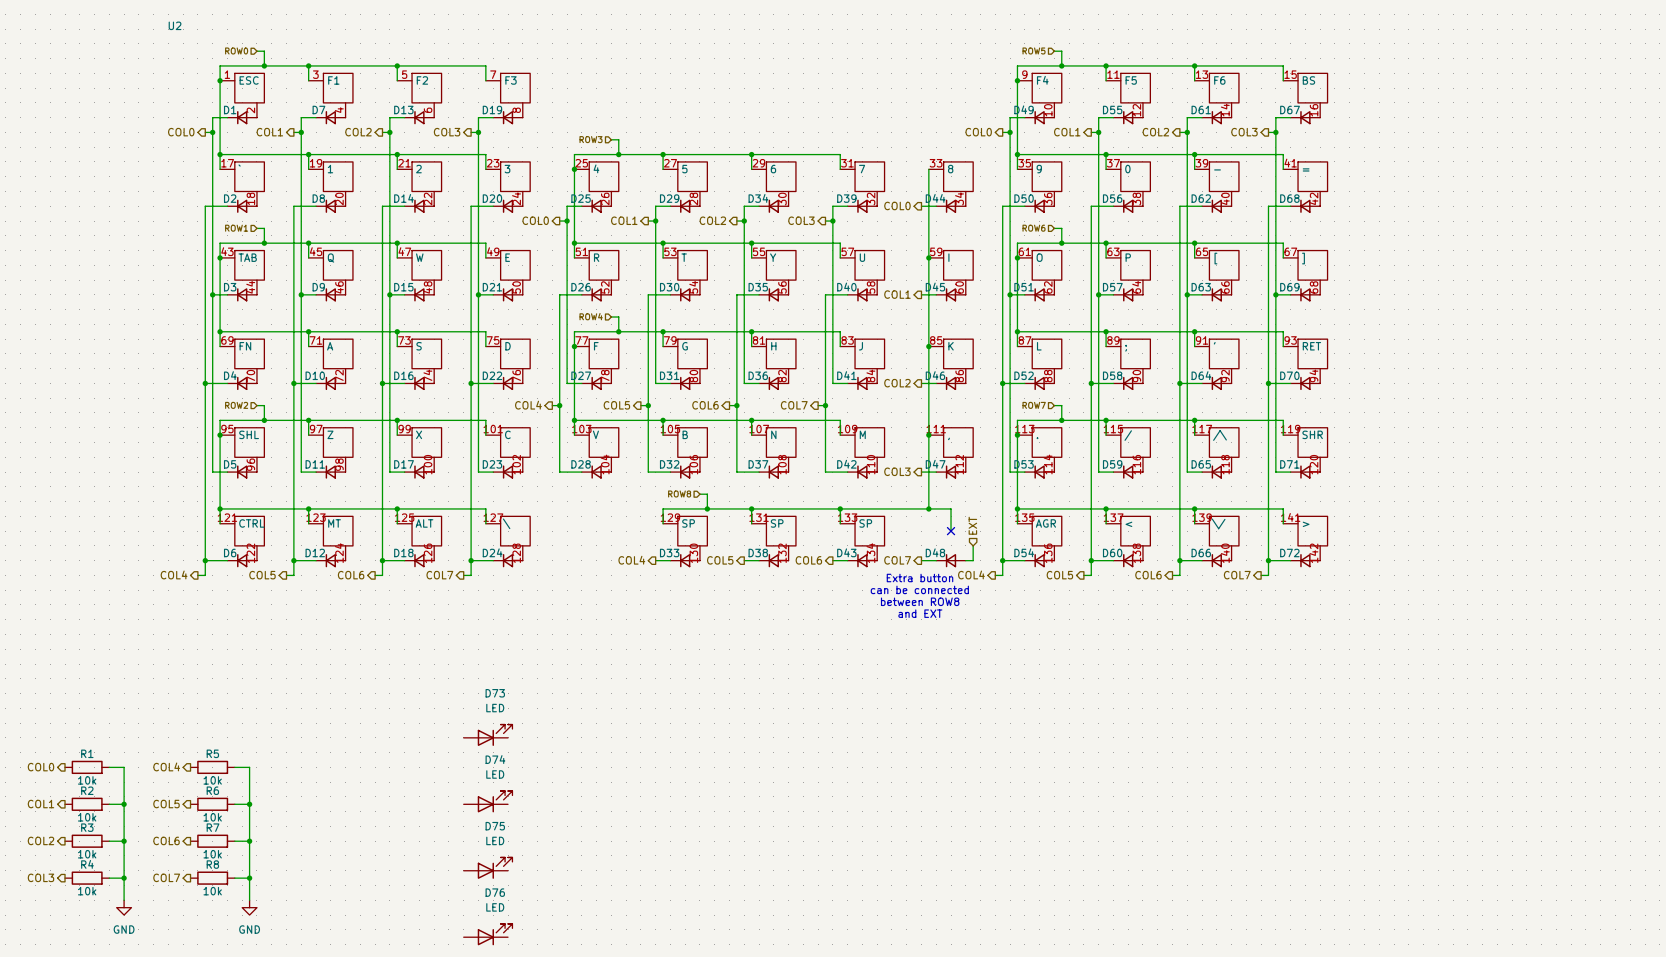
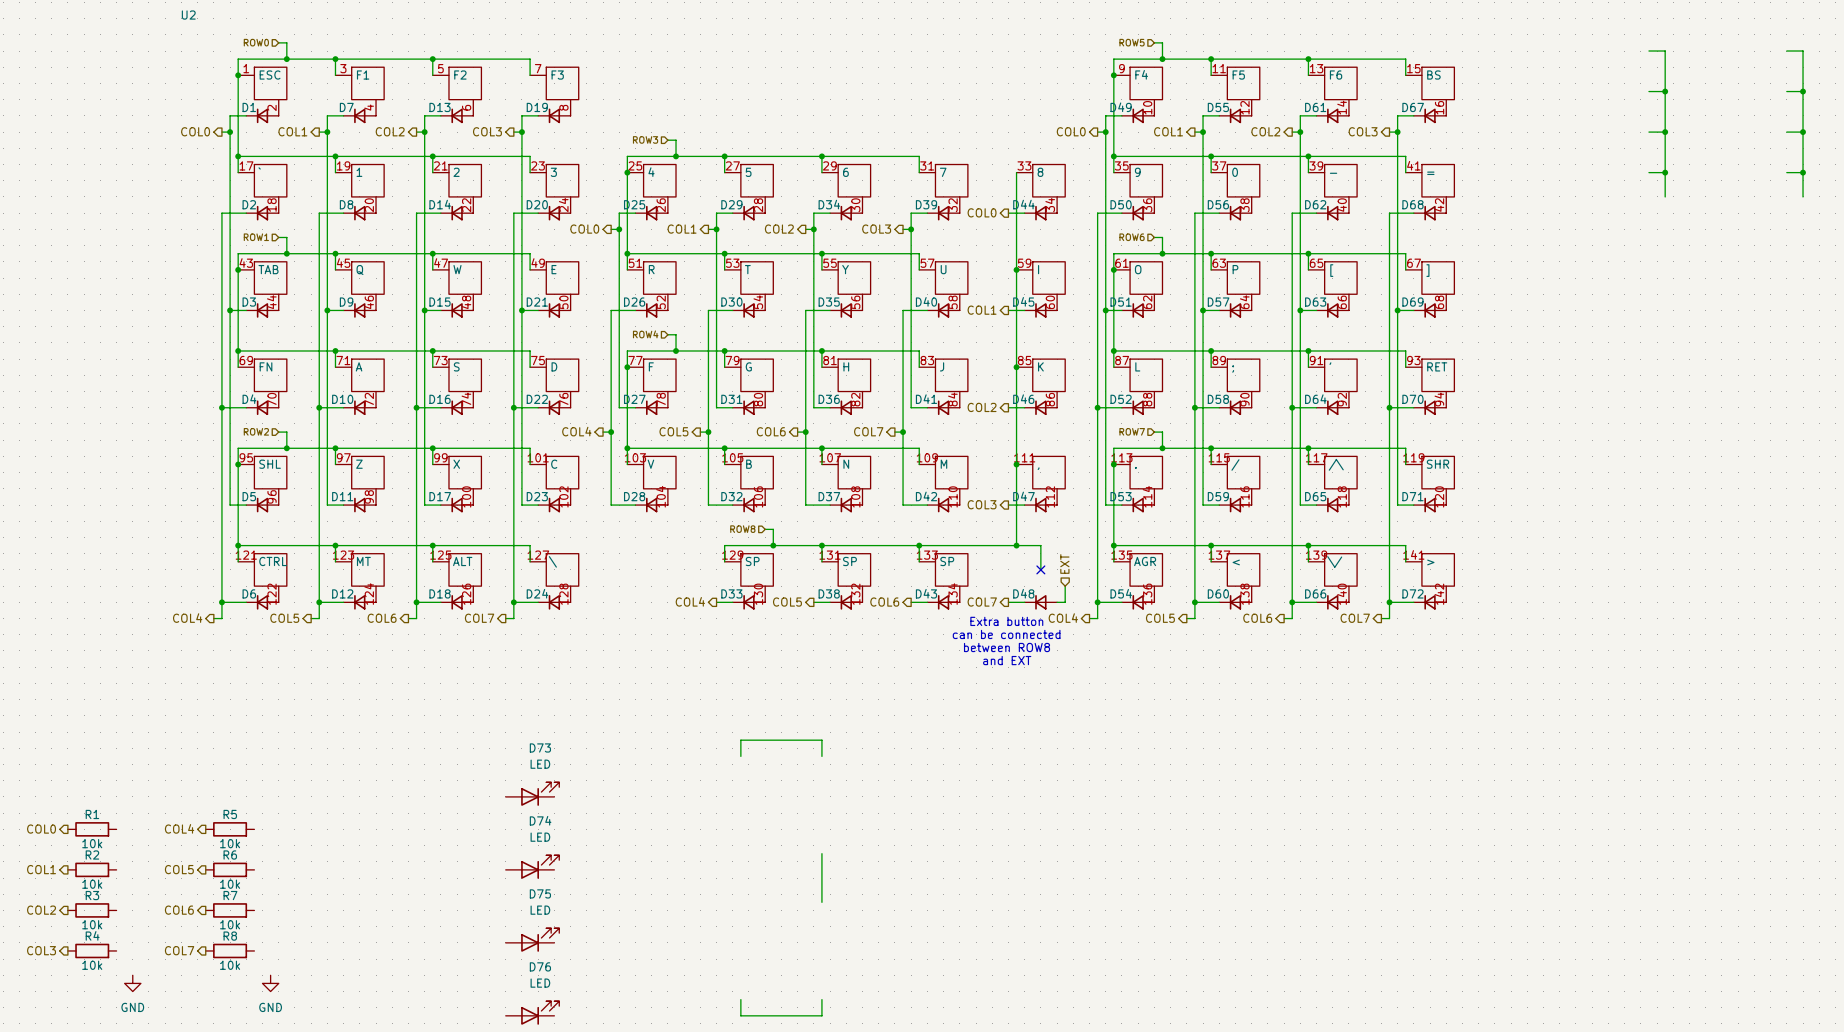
wire: none -> (1648, 51) (1665, 51) (1665, 196)
wire: none -> (1786, 51) (1803, 51) (1803, 196)
wire: none -> (1648, 91) (1665, 91)
junction: none -> (1665, 91)
wire: none -> (1786, 91) (1803, 91)
junction: none -> (1803, 91)
wire: none -> (1648, 132) (1665, 132)
junction: none -> (1665, 132)
wire: none -> (1786, 132) (1803, 132)
junction: none -> (1803, 132)
wire: none -> (1648, 172) (1665, 172)
junction: none -> (1665, 172)
wire: none -> (1786, 172) (1803, 172)
junction: none -> (1803, 172)
wire: none -> (740, 756) (740, 740) (821, 740) (821, 756)
wire: (109, 767) (124, 767) (124, 900) -> none
wire: (234, 767) (249, 767) (249, 900) -> none
wire: none -> (821, 853) (821, 902)
wire: (109, 804) (124, 804) -> none
junction: (124, 804) -> none
wire: (234, 804) (249, 804) -> none
junction: (249, 804) -> none
wire: (109, 841) (124, 841) -> none
junction: (124, 841) -> none
wire: (234, 841) (249, 841) -> none
junction: (249, 841) -> none
wire: (109, 878) (124, 878) -> none
junction: (124, 878) -> none
wire: (234, 878) (249, 878) -> none
junction: (249, 878) -> none
wire: none -> (740, 999) (740, 1015) (821, 1015) (821, 999)

